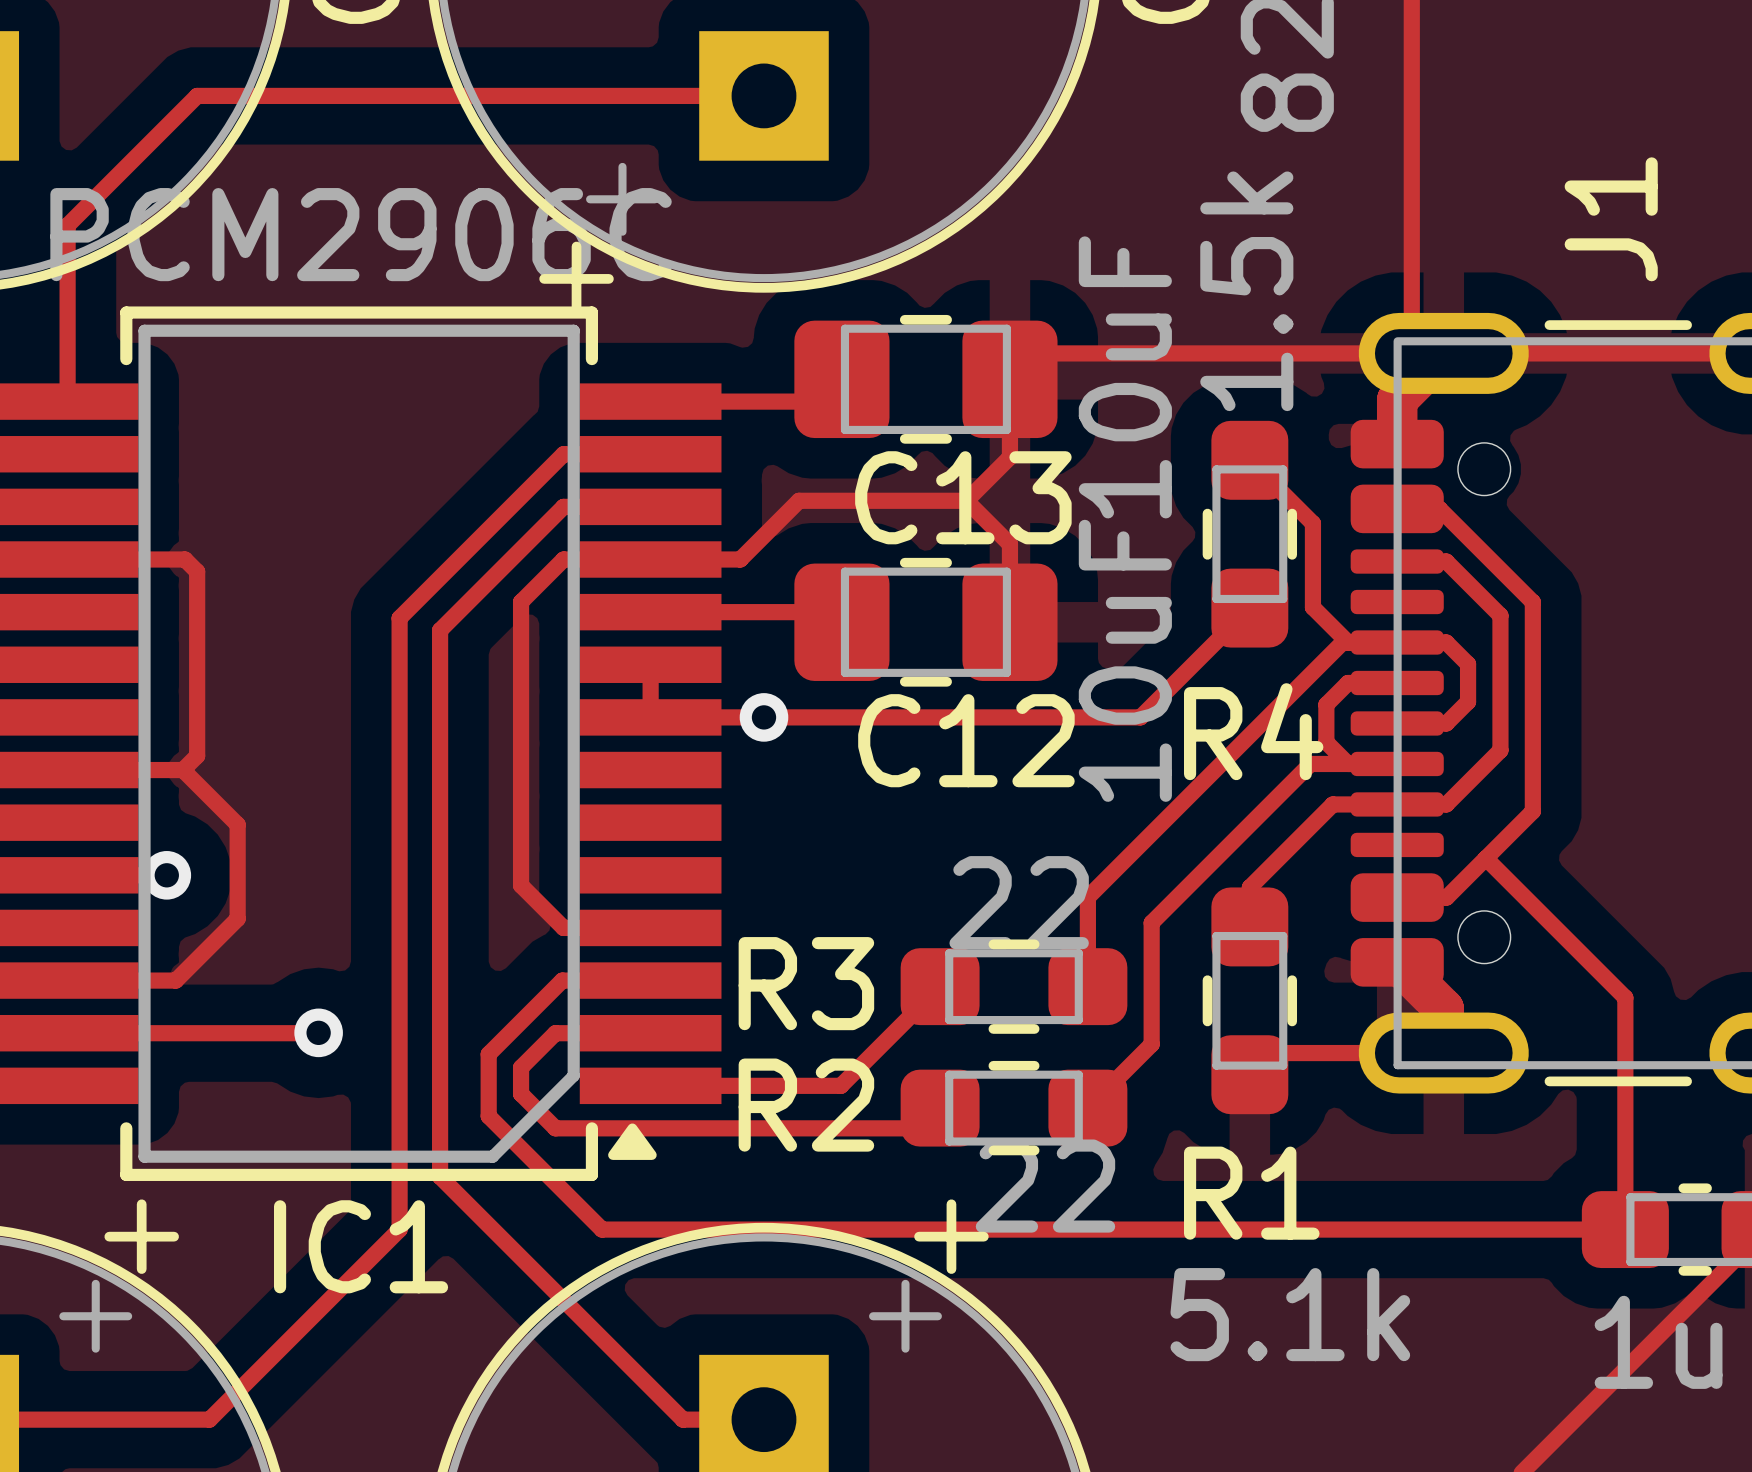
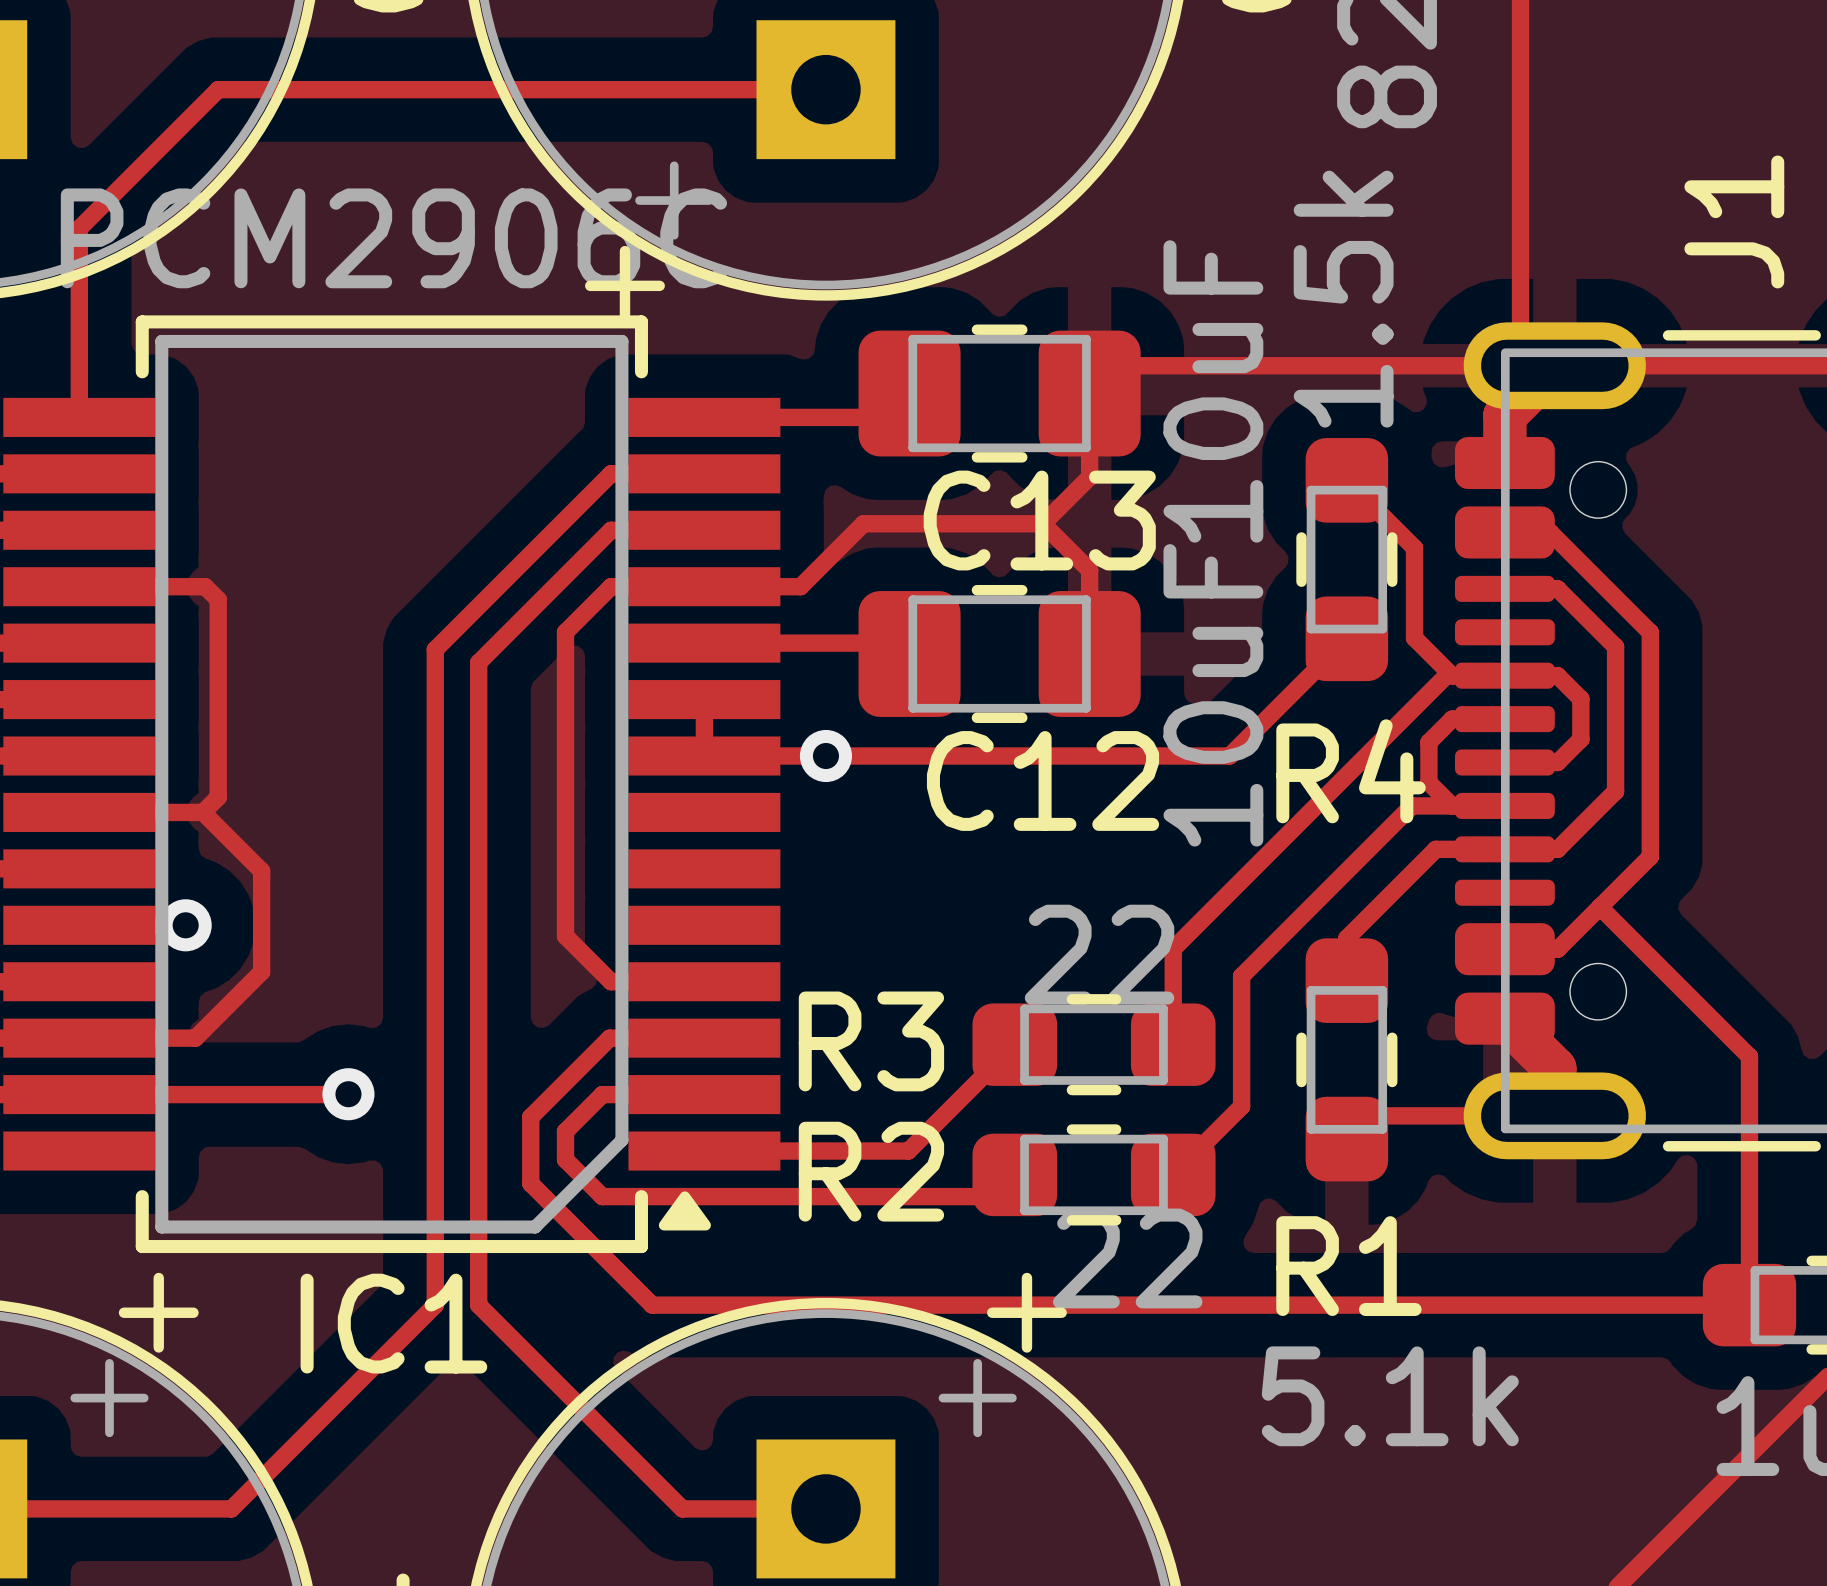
track: (440, 1176) (683, 1419) -> (478, 1248) (478, 1305) (682, 1508) (739, 1508)

